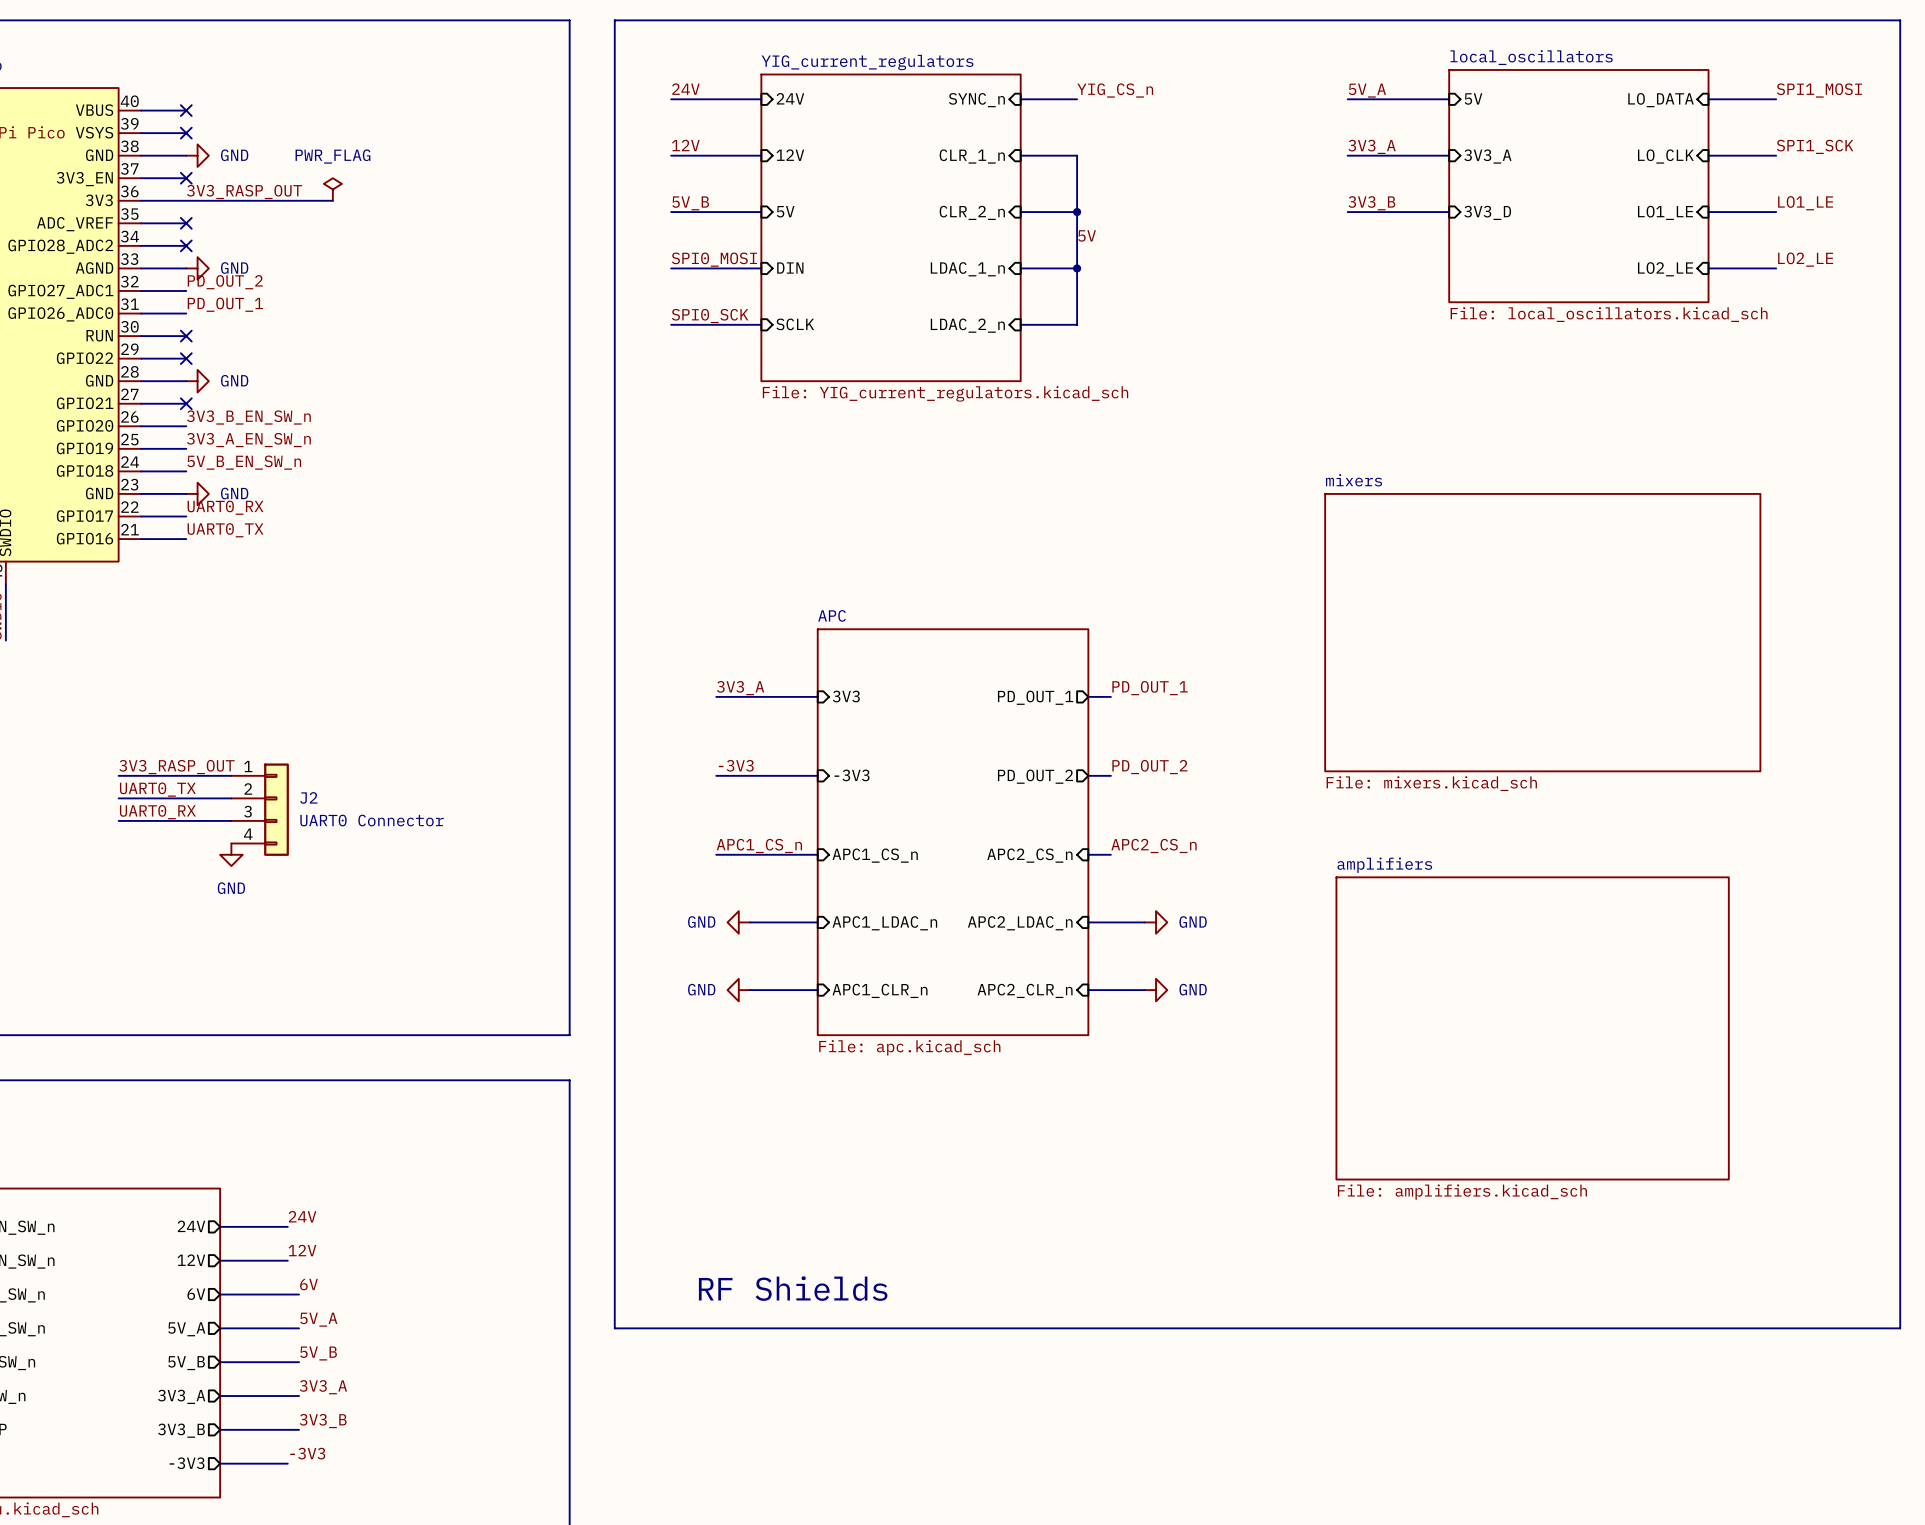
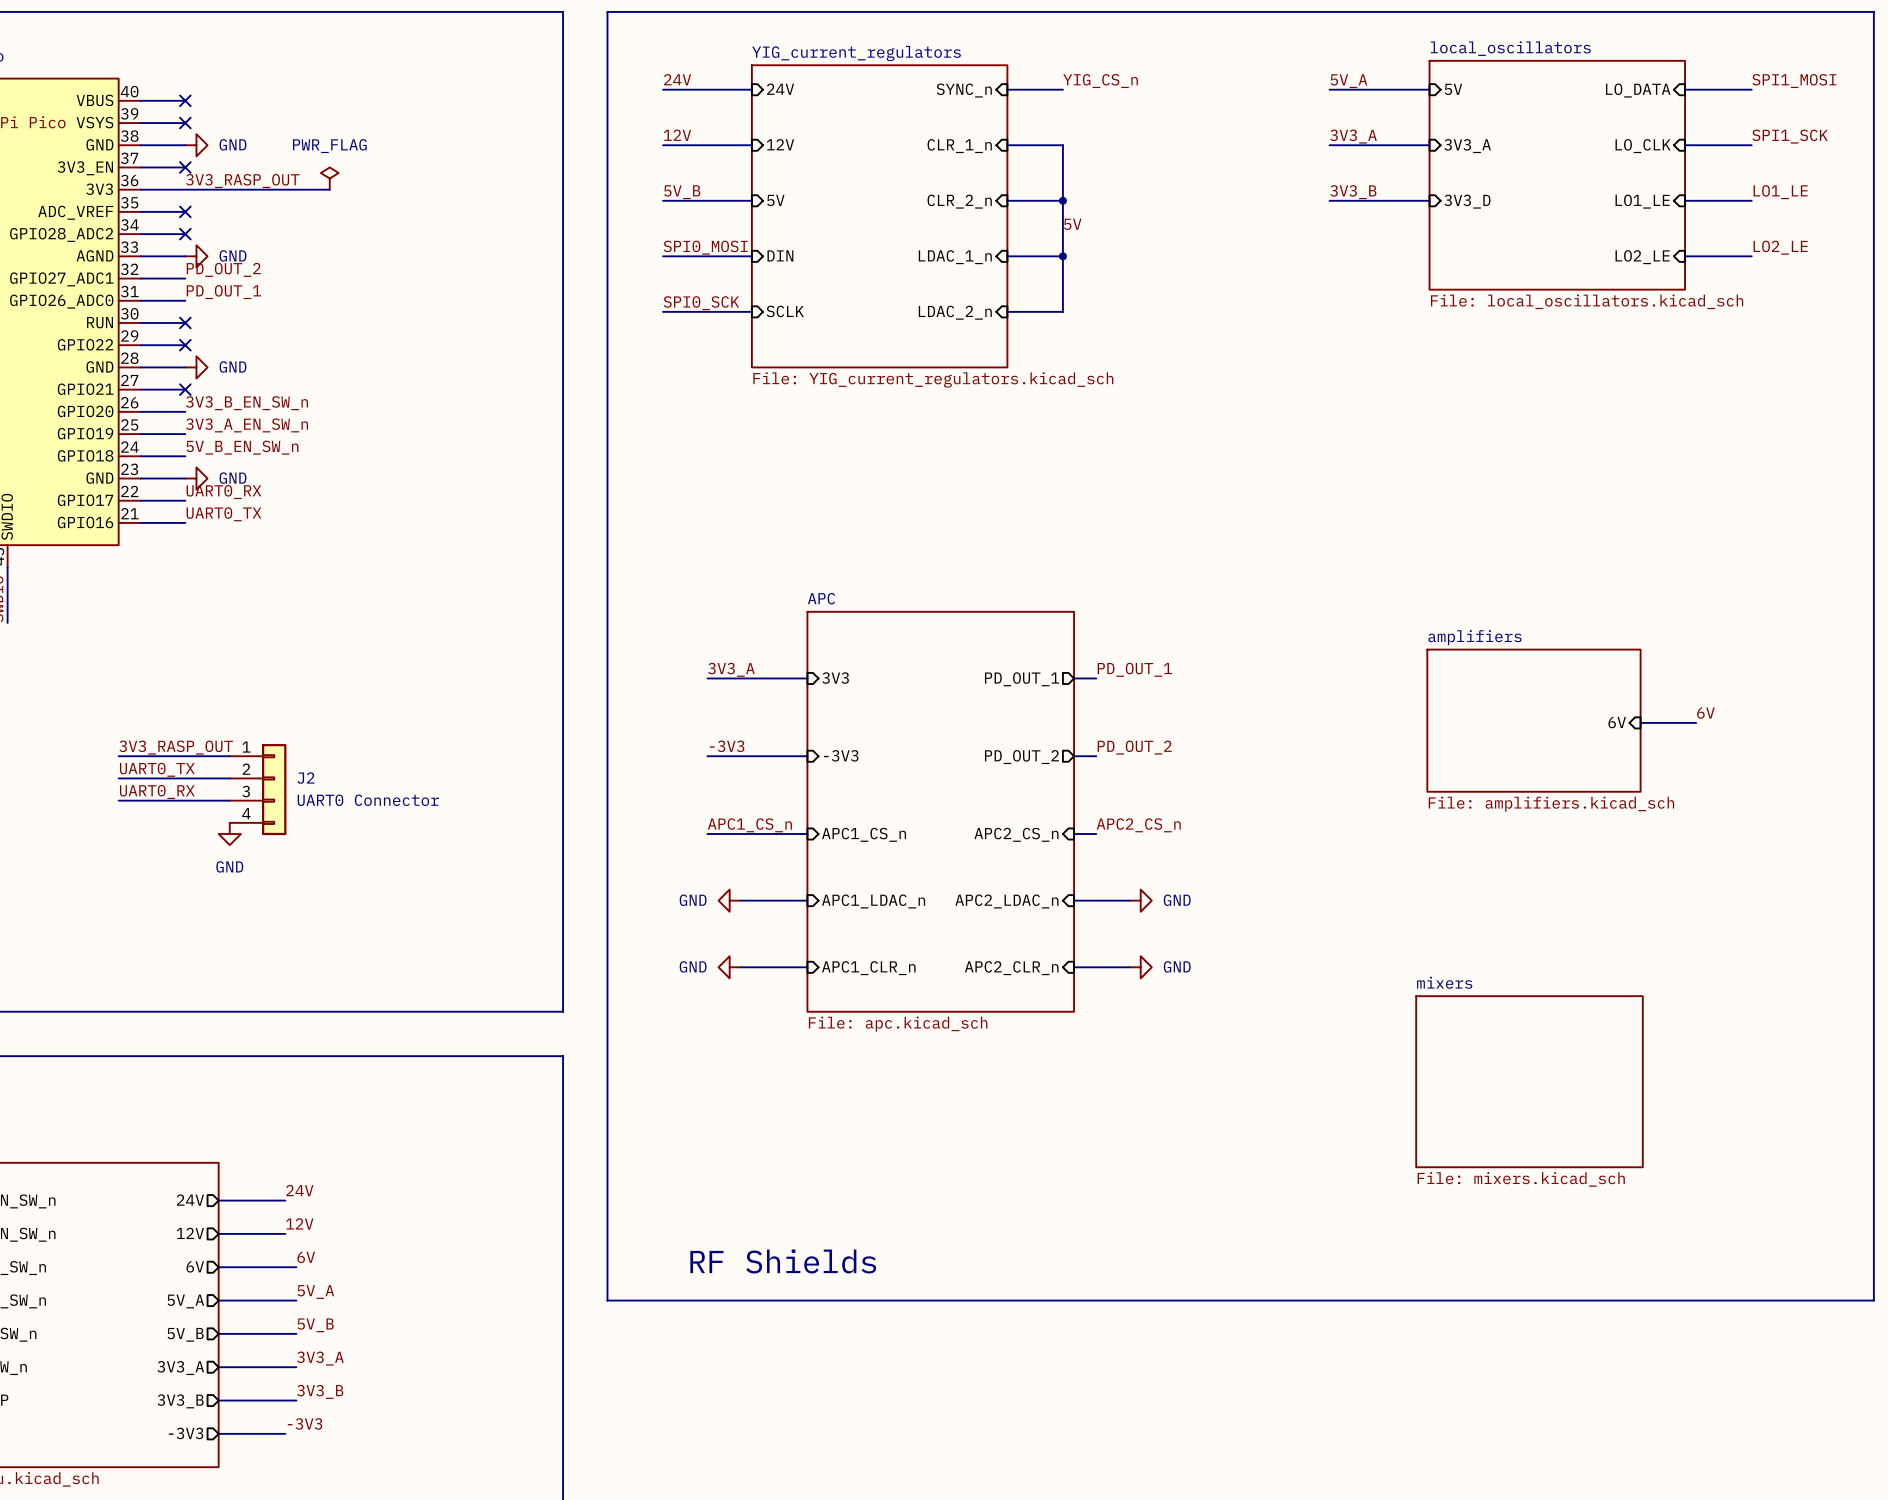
sheet mixers: File: mixers.kicad_sch (1542, 632) -> none
label: none -> 6V (1705, 713)
sheet amplifiers: none -> File: amplifiers.kicad_sch (1533, 720)
sheet pin: none -> 6V (1617, 722)
wire: none -> (1640, 722) (1696, 722)
sheet amplifiers: File: amplifiers.kicad_sch (1532, 1028) -> none
sheet mixers: none -> File: mixers.kicad_sch (1529, 1081)

